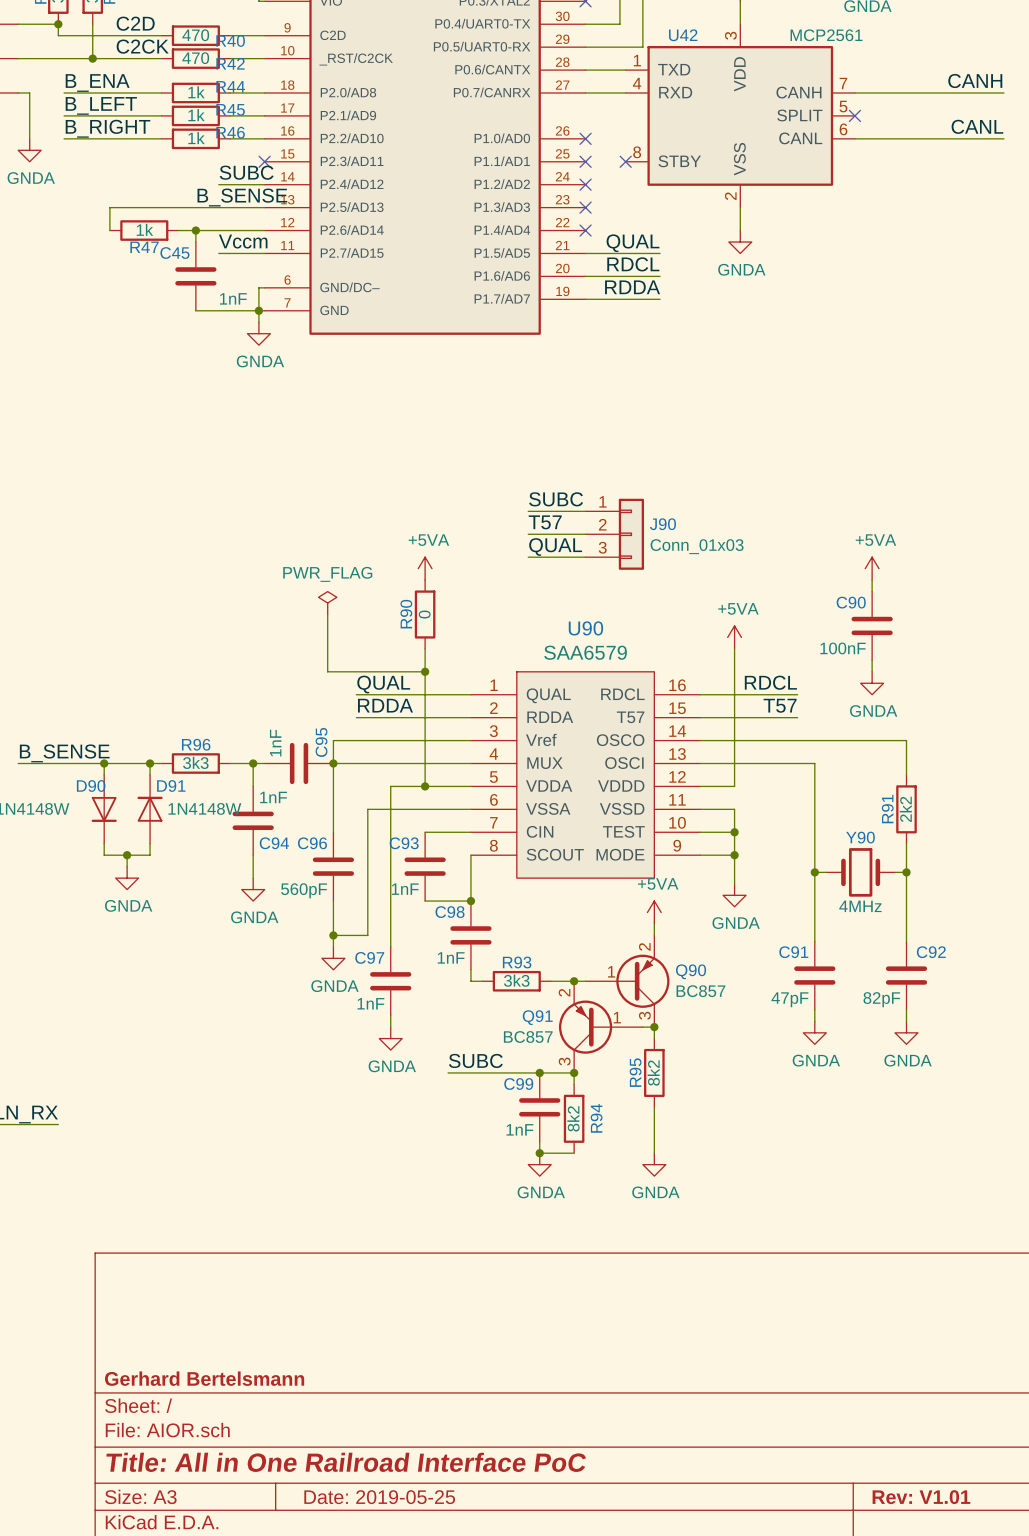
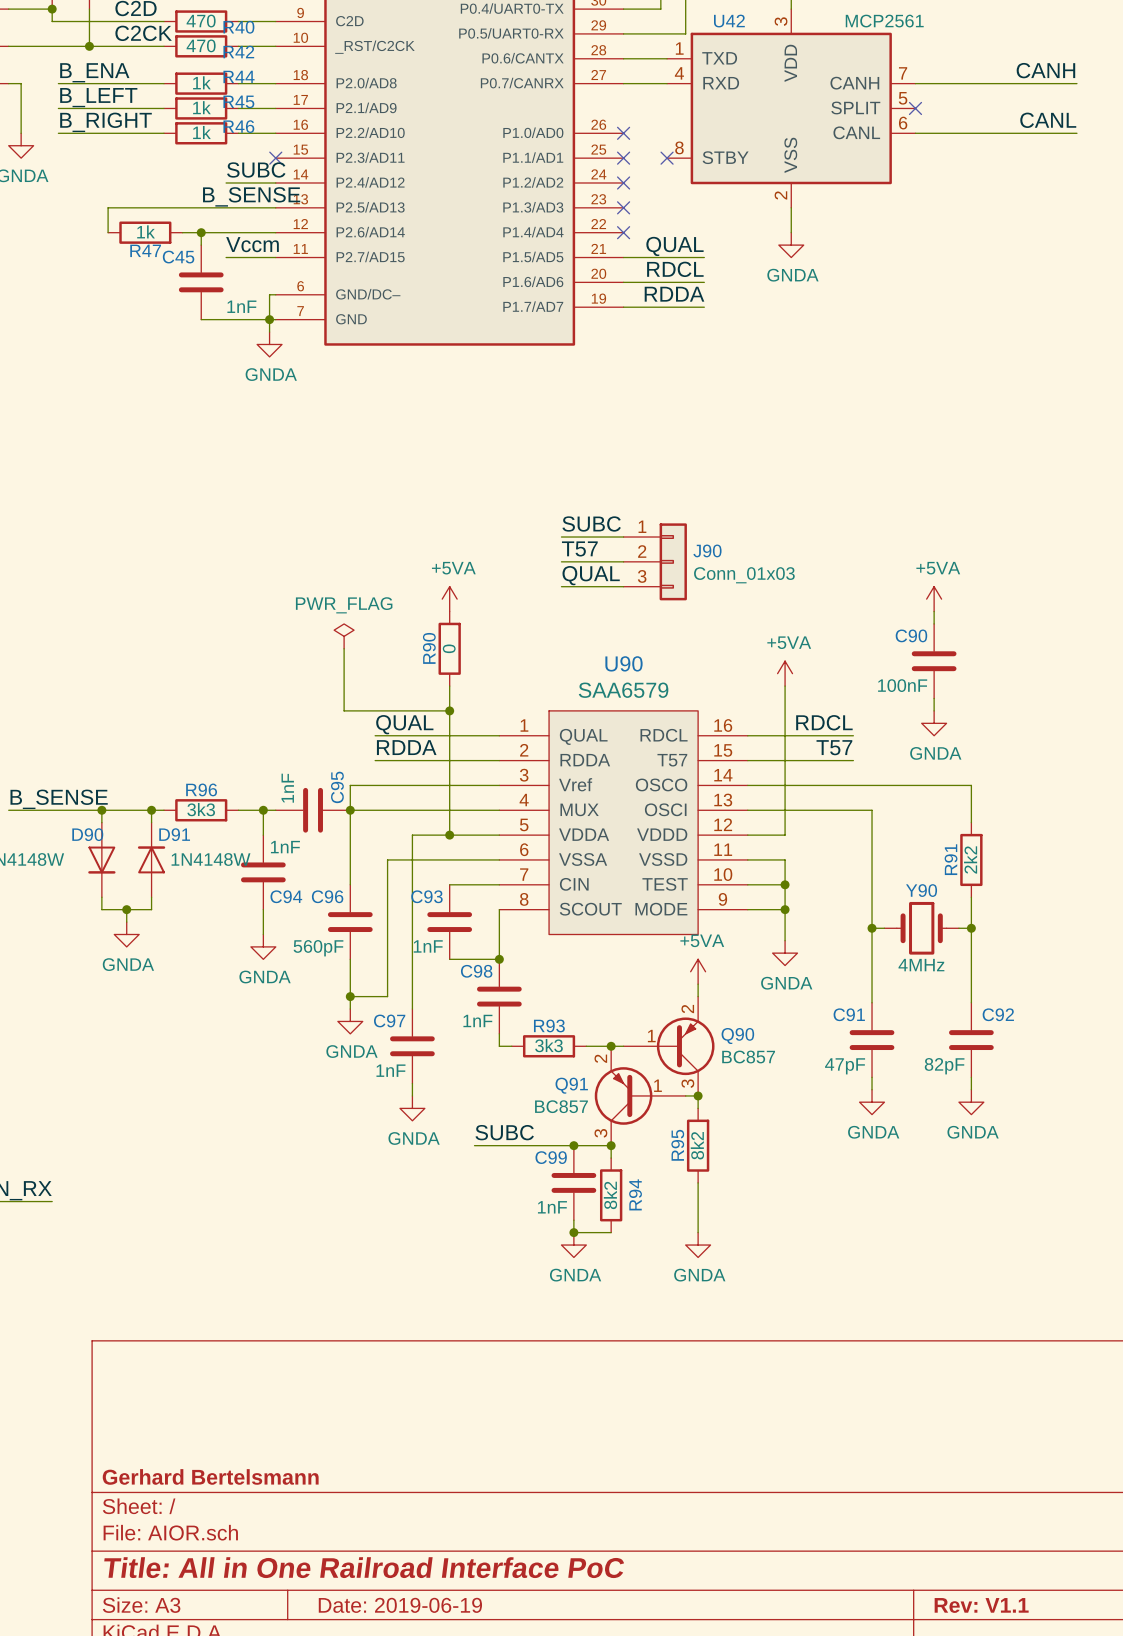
title block: Date: 2019-05-25 (379, 1497) -> Date: 2019-06-19 (400, 1605)
title block: Rev: V1.01 (921, 1497) -> Rev: V1.1 (981, 1605)

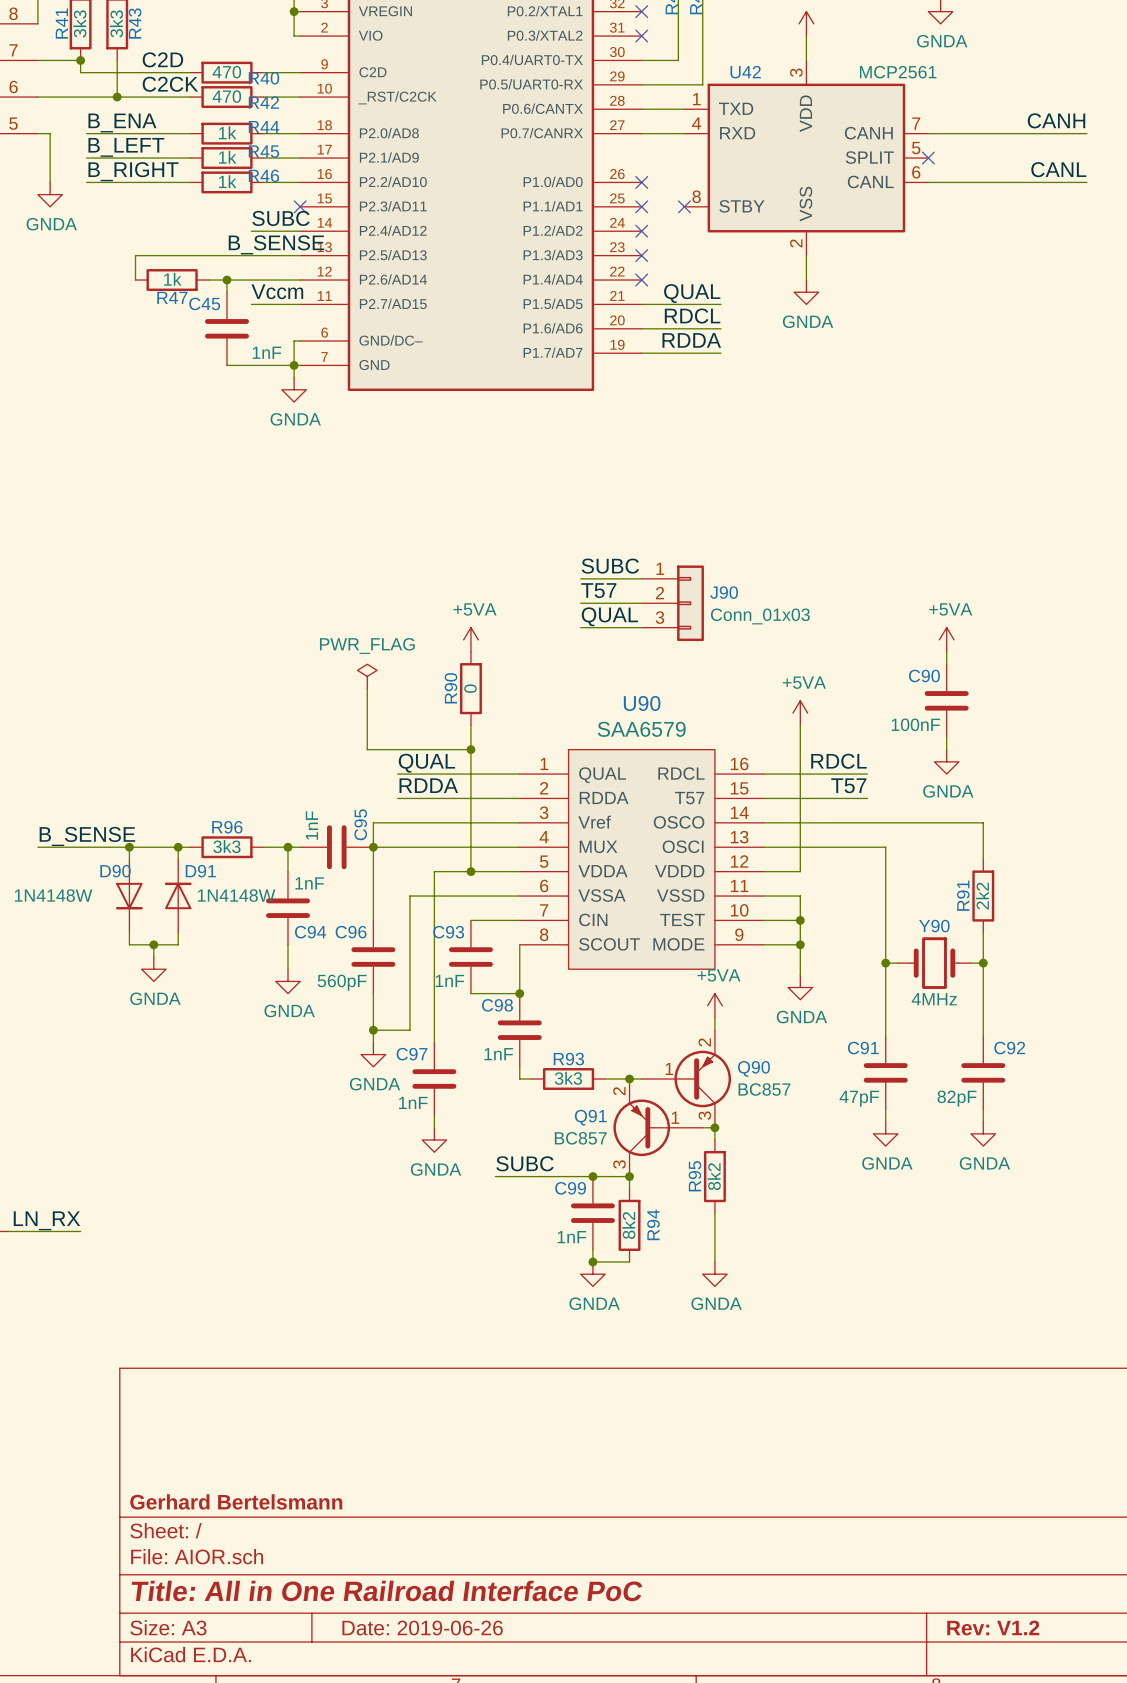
title block: Date: 2019-06-19 (400, 1605) -> Date: 2019-06-26 (422, 1628)
title block: Rev: V1.1 (981, 1605) -> Rev: V1.2 (993, 1628)

